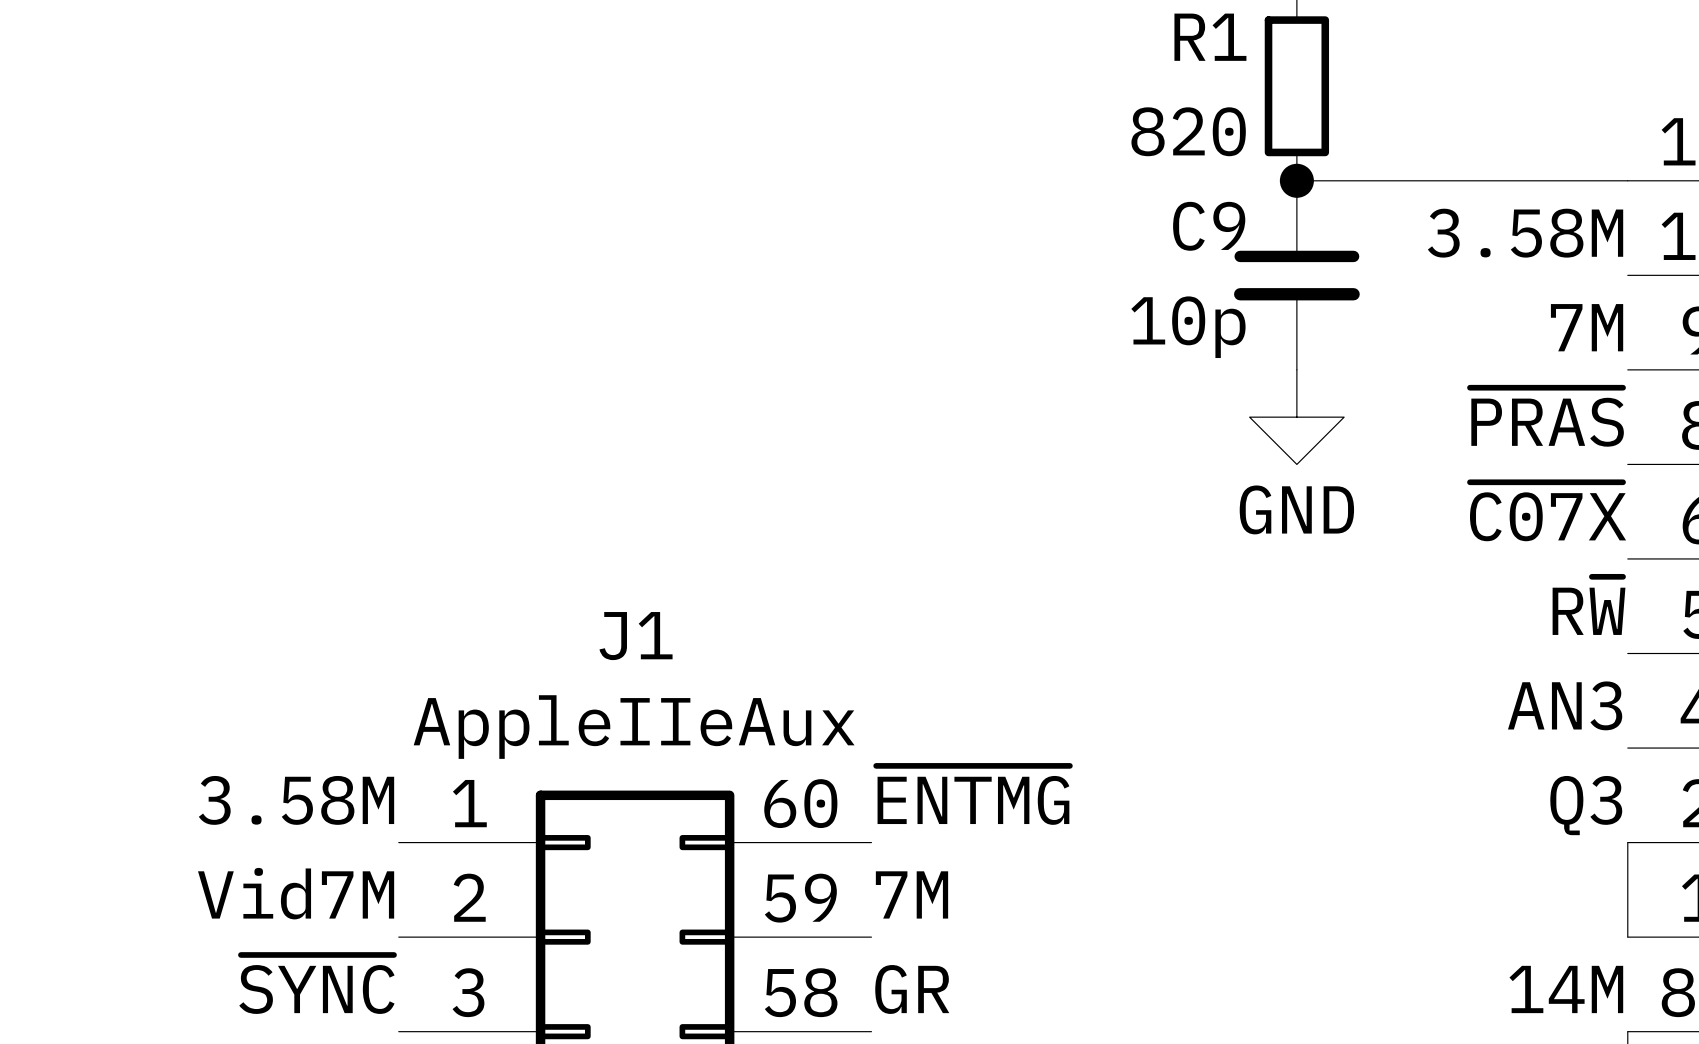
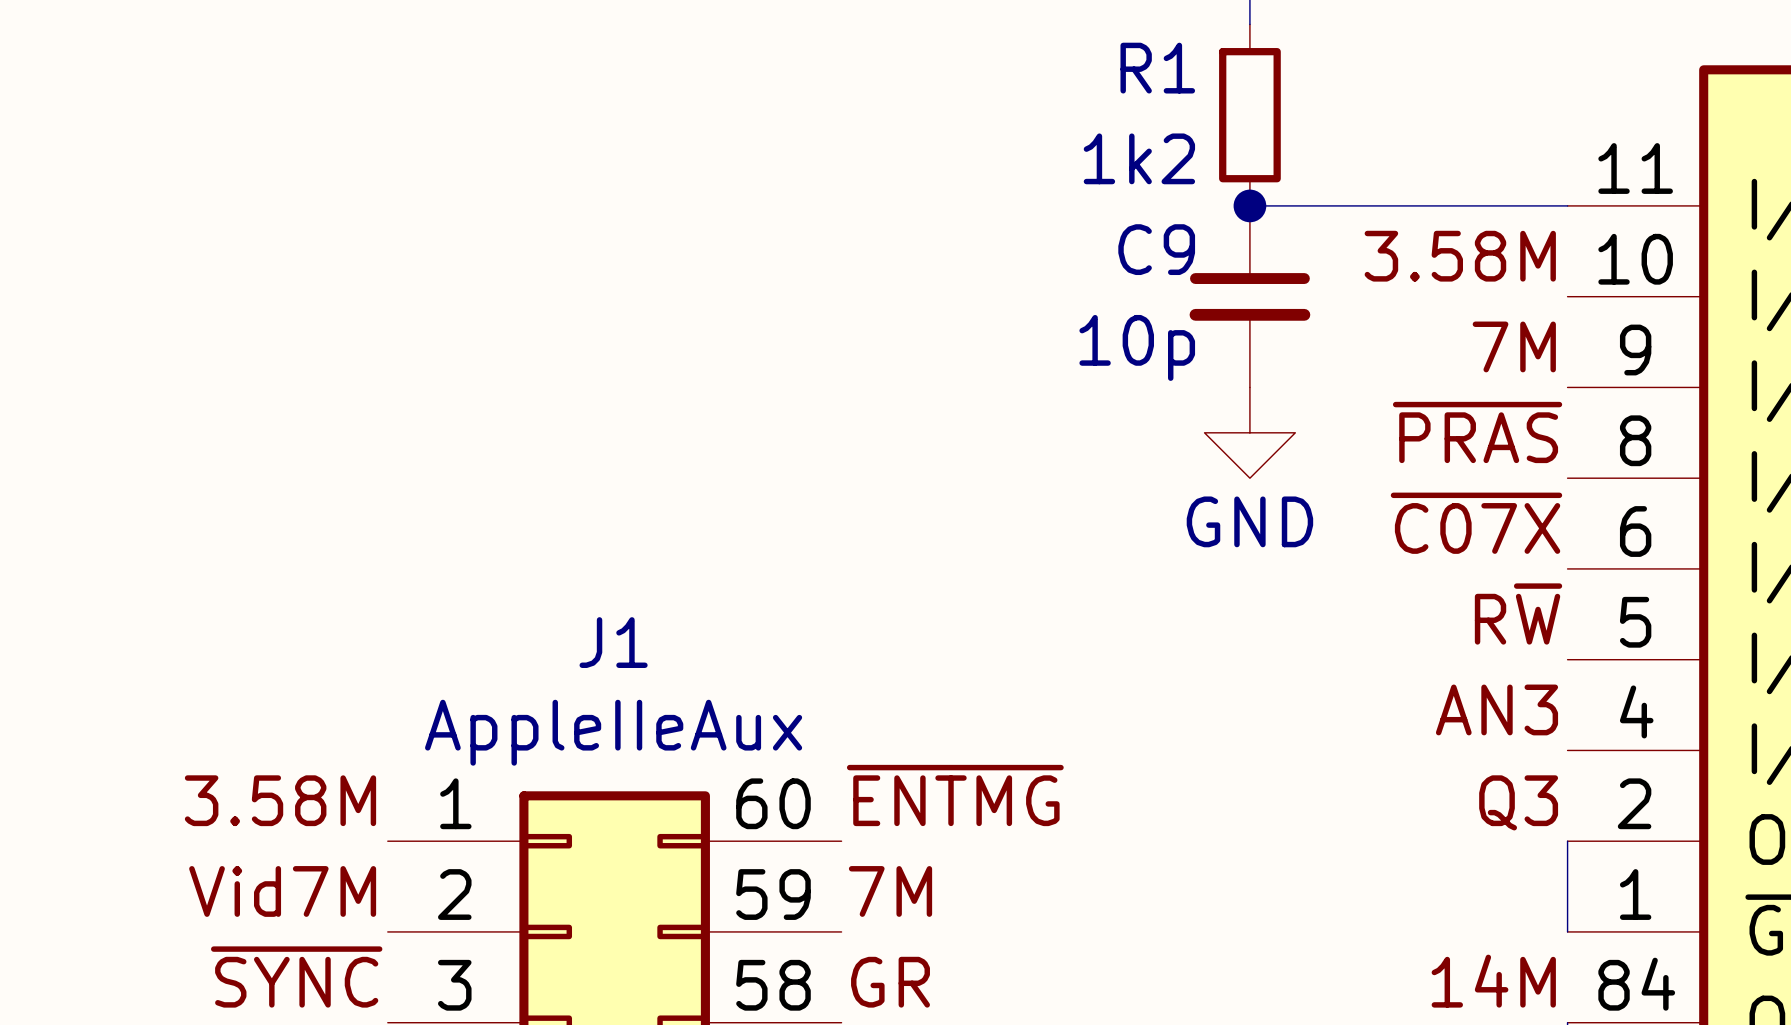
R1 value: 820 (1188, 131) -> 1k2 (1139, 158)

